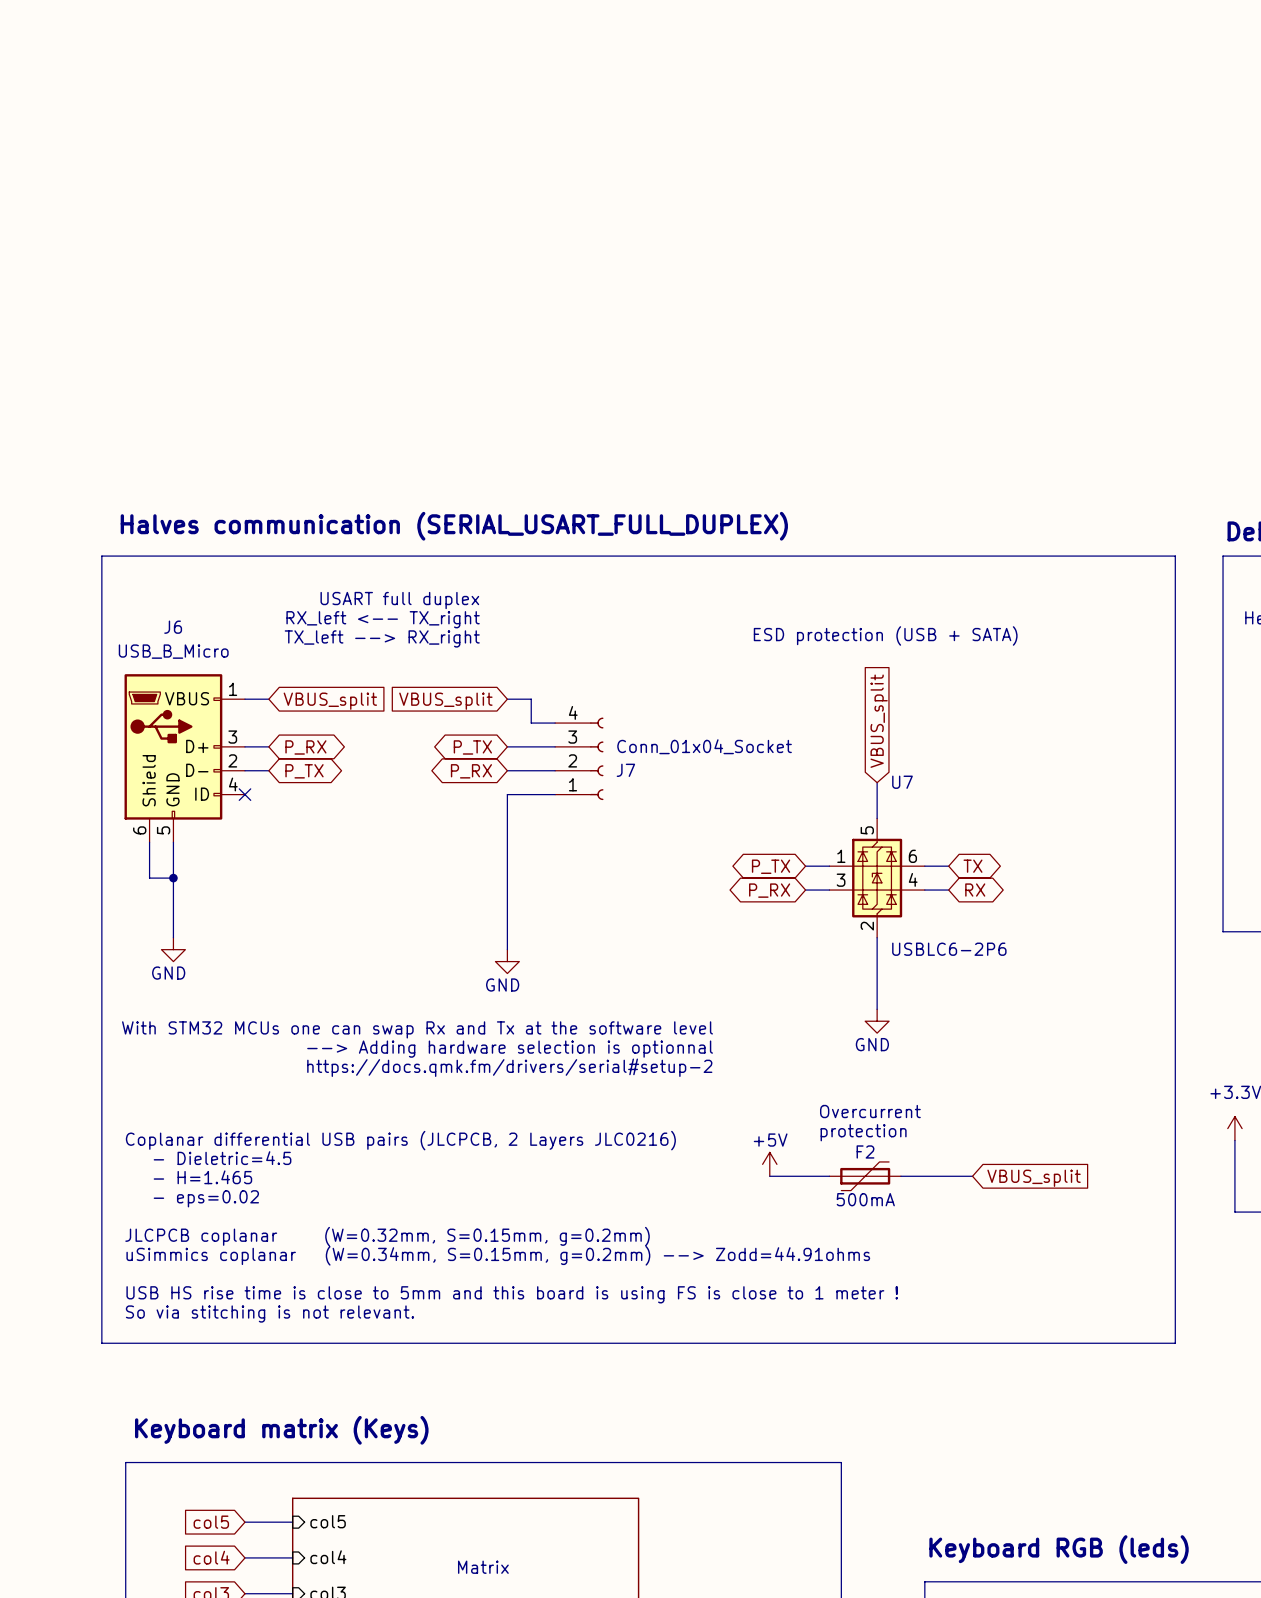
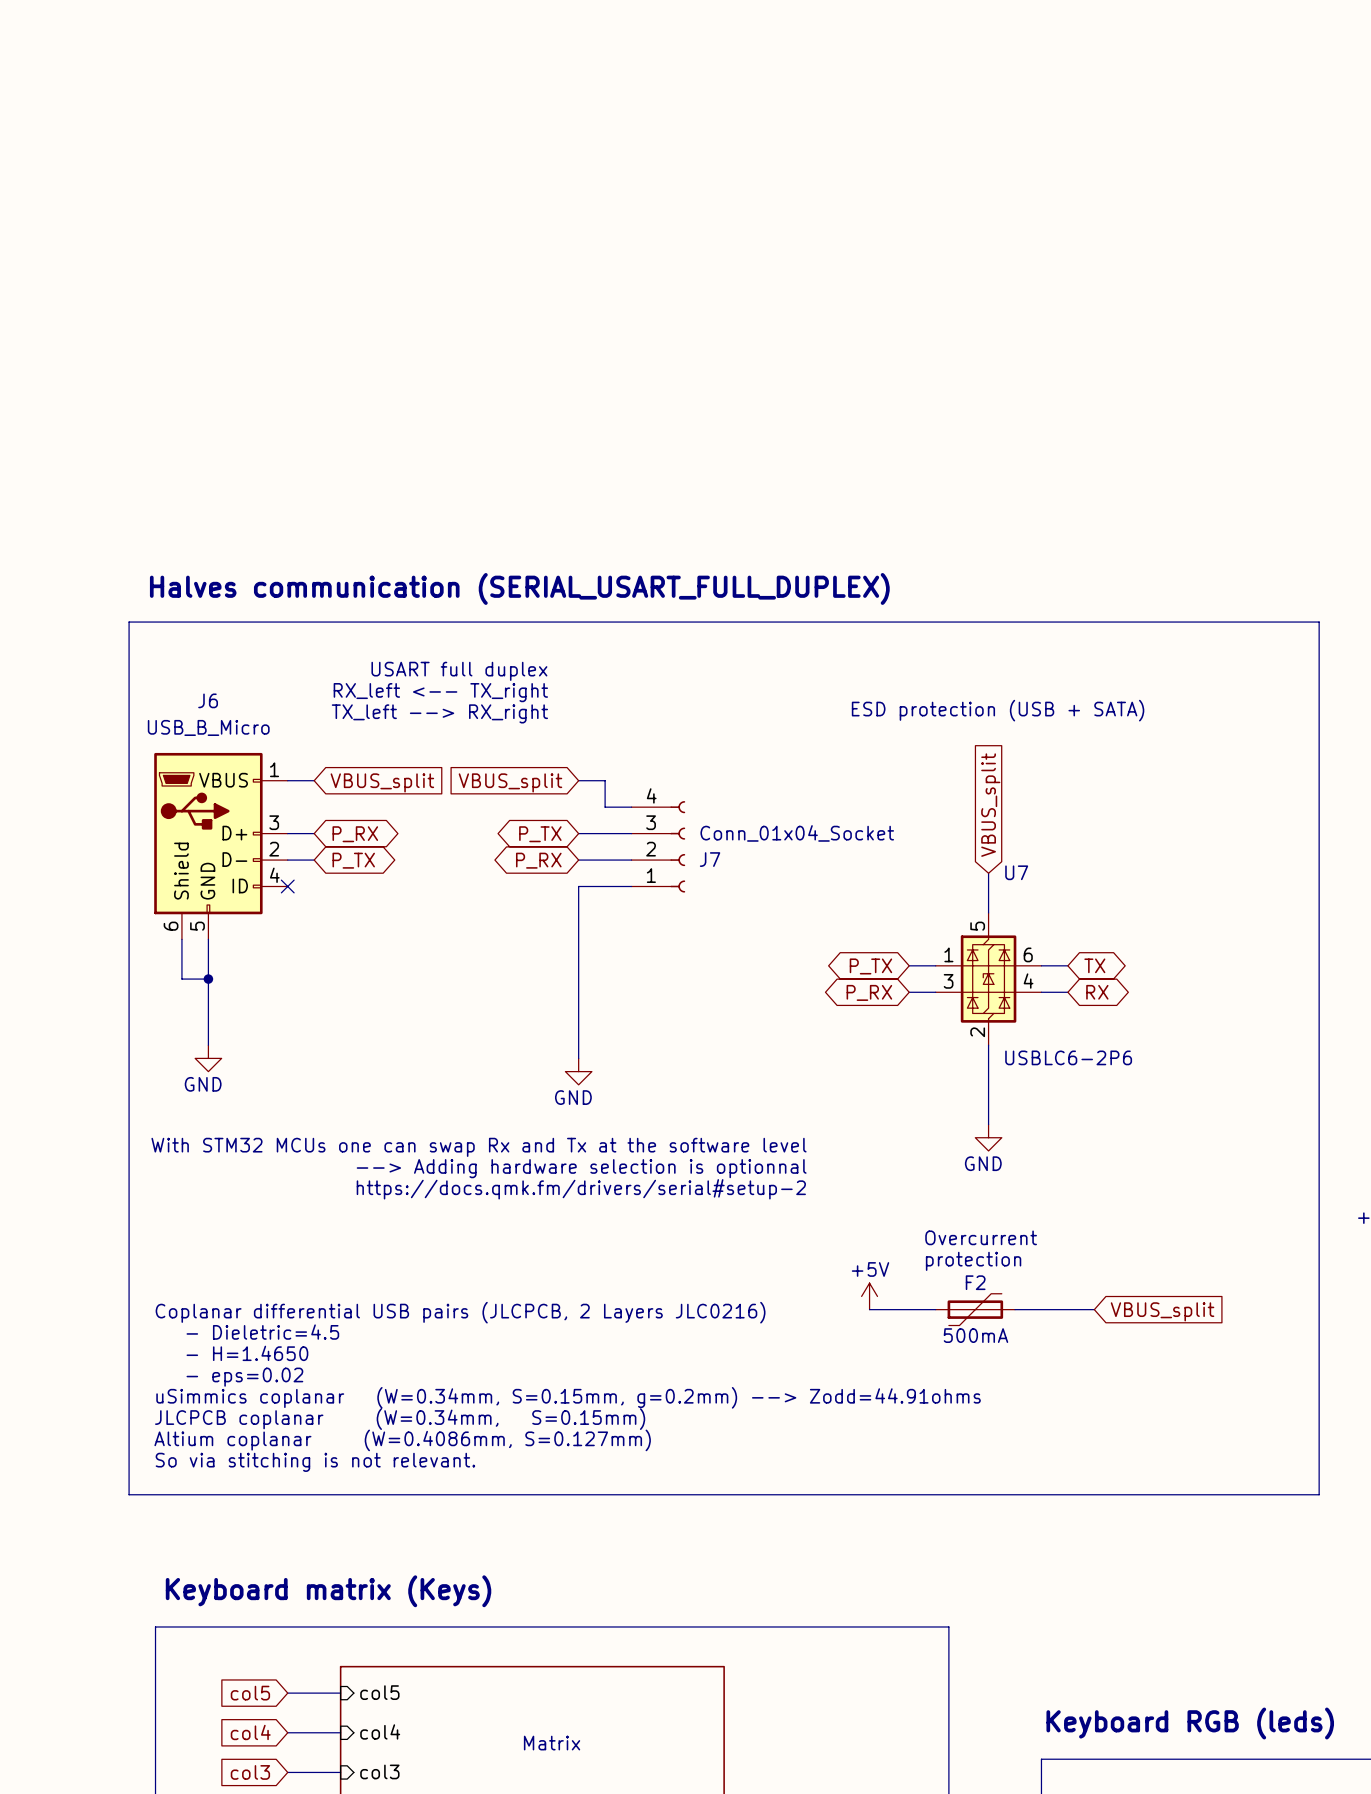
text: Coplanar differential USB pairs (JLCPCB, 2 Layers JLC0216) (400, 1140) -> none
text: - Dieletric=4.5 (222, 1158) -> none
text: - H=1.465 (202, 1177) -> Coplanar differential USB pairs (JLCPCB, 2 Layers JLC0216) (460, 1312)
text: - eps=0.02 (206, 1198) -> - Dieletric=4.5 (262, 1332)
text: none -> - H=1.4650 (247, 1353)
text: JLCPCB coplanar (W=0.32mm, S=0.15mm, g=0.2mm) (387, 1236) -> - eps=0.02 (244, 1377)
text: none -> JLCPCB coplanar (W=0.34mm, S=0.15mm) (400, 1419)
text: USB HS rise time is close to 5mm and this board is using FS is close to 1 meter ! (512, 1294) -> Altium coplanar (W=0.4086mm, S=0.127mm) (402, 1440)

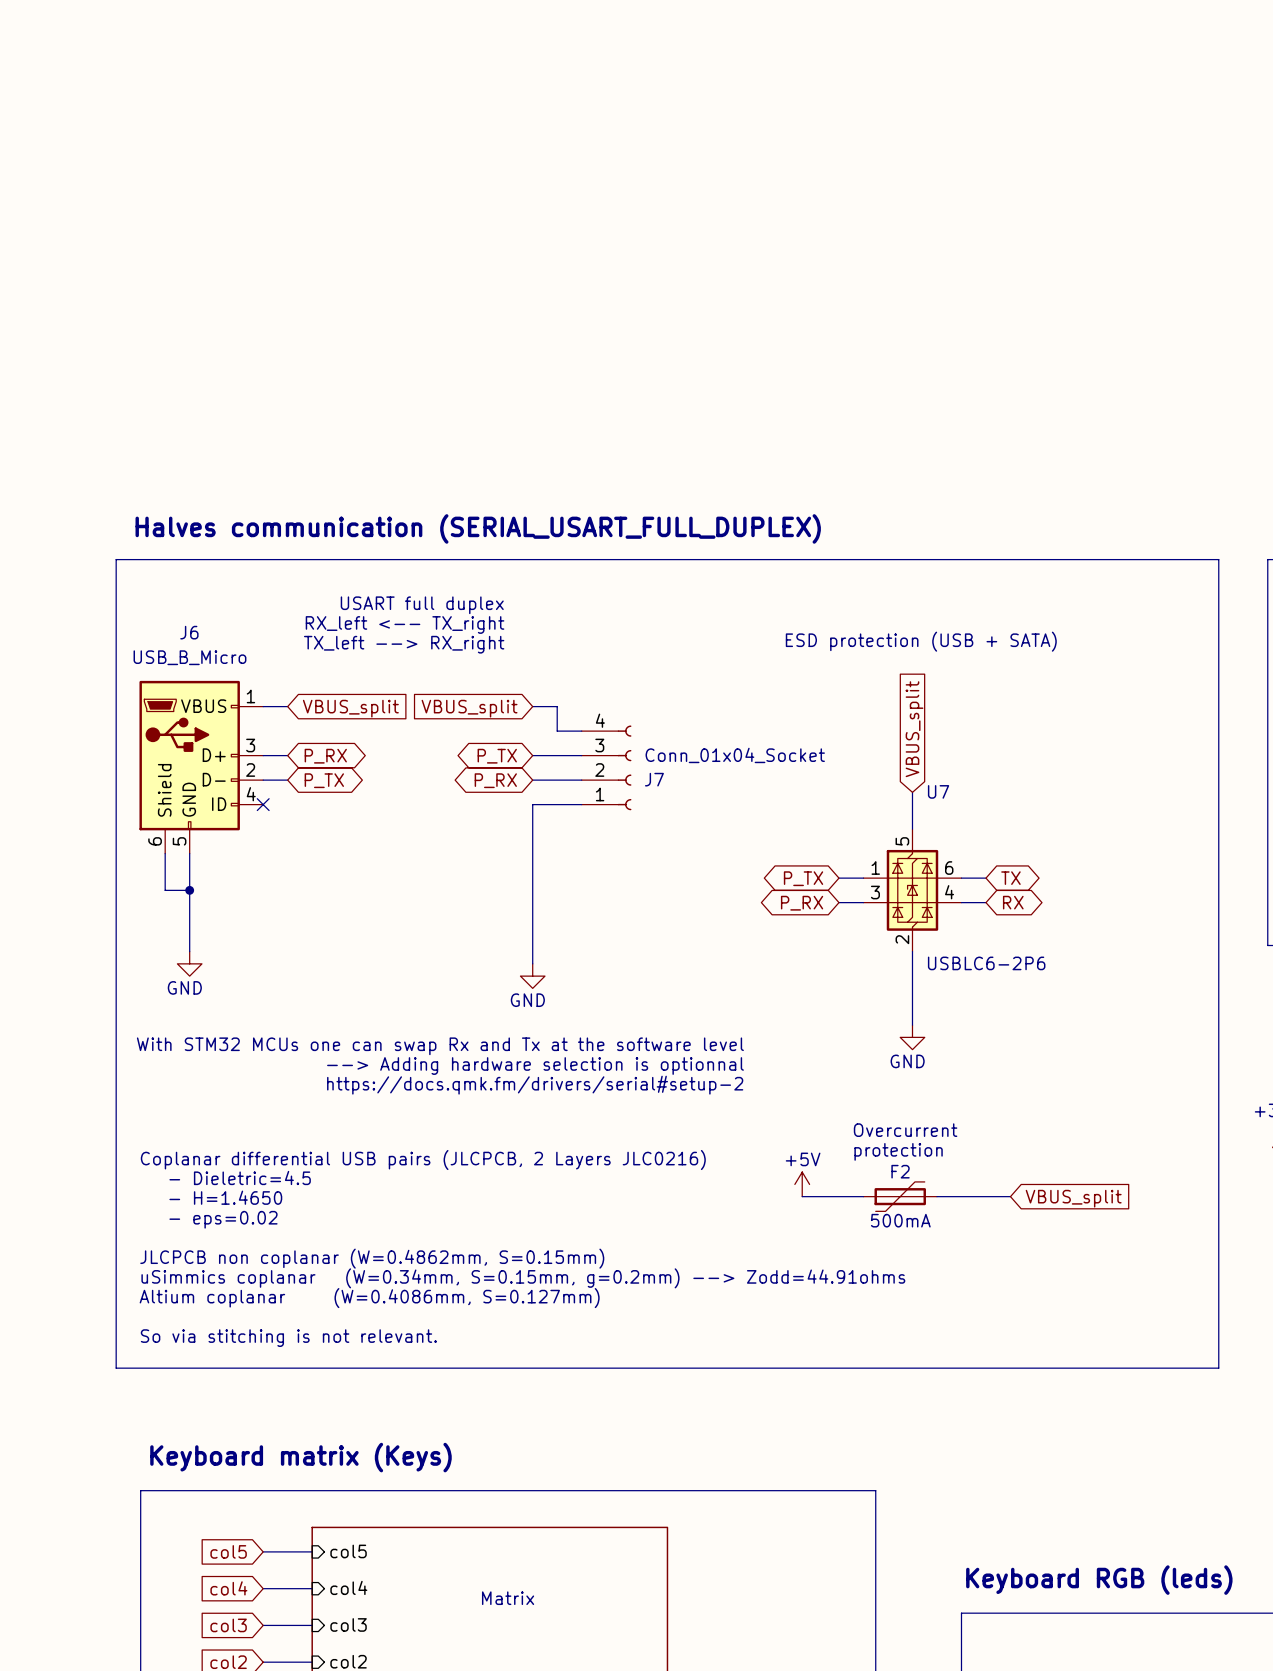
text: none -> Coplanar differential USB pairs (JLCPCB, 2 Layers JLC0216) (423, 1160)
text: none -> - Dieletric=4.5 (240, 1177)
text: Coplanar differential USB pairs (JLCPCB, 2 Layers JLC0216) (460, 1312) -> - H=1.4650 (225, 1197)
text: - Dieletric=4.5 (262, 1332) -> - eps=0.02 (223, 1219)
text: - H=1.4650 (247, 1353) -> none
text: - eps=0.02 (244, 1377) -> JLCPCB non coplanar (W=0.4862mm, S=0.15mm) (372, 1258)
text: JLCPCB coplanar (W=0.34mm, S=0.15mm) (400, 1419) -> Altium coplanar (W=0.4086mm, S=0.127mm) (369, 1298)
text: Altium coplanar (W=0.4086mm, S=0.127mm) (402, 1440) -> none

